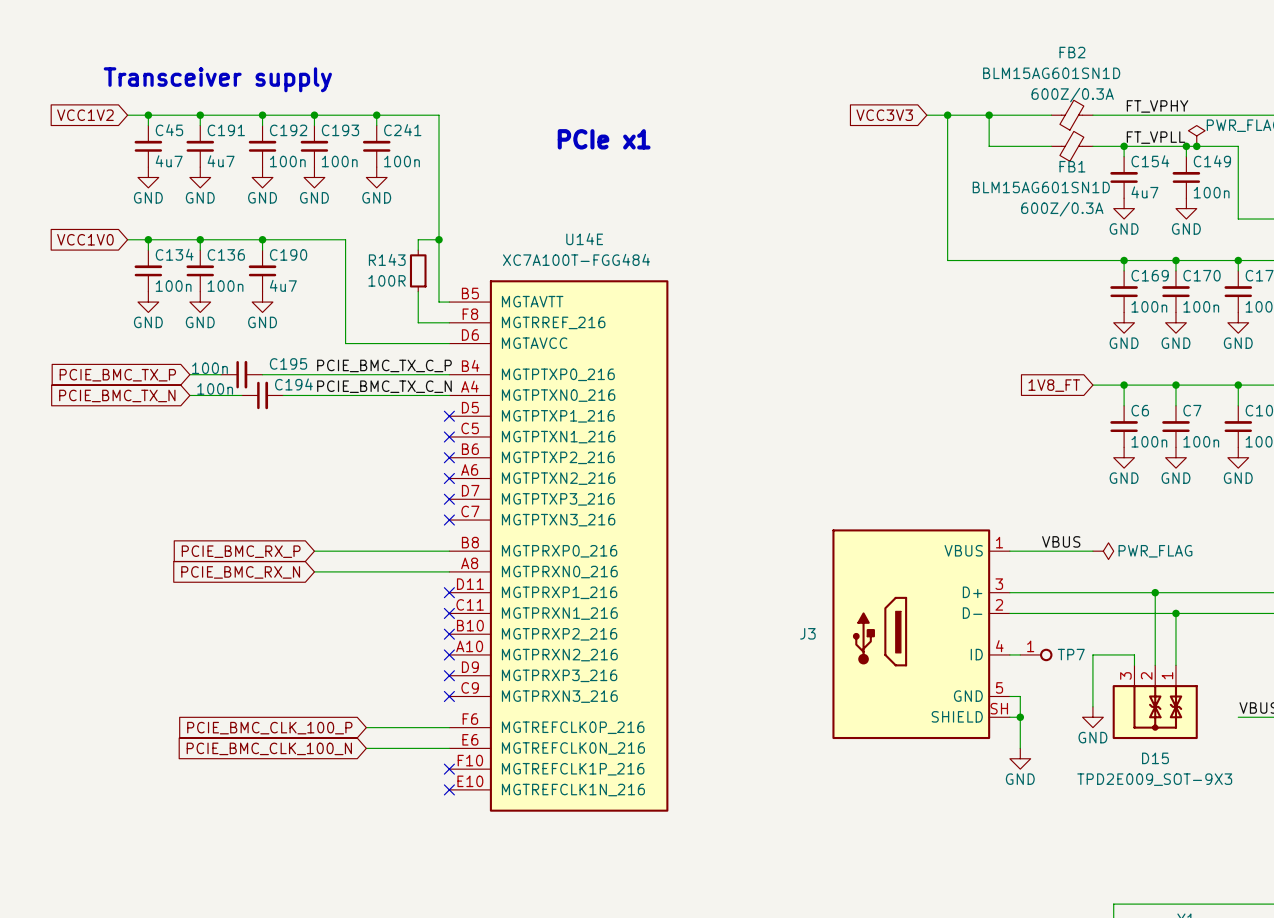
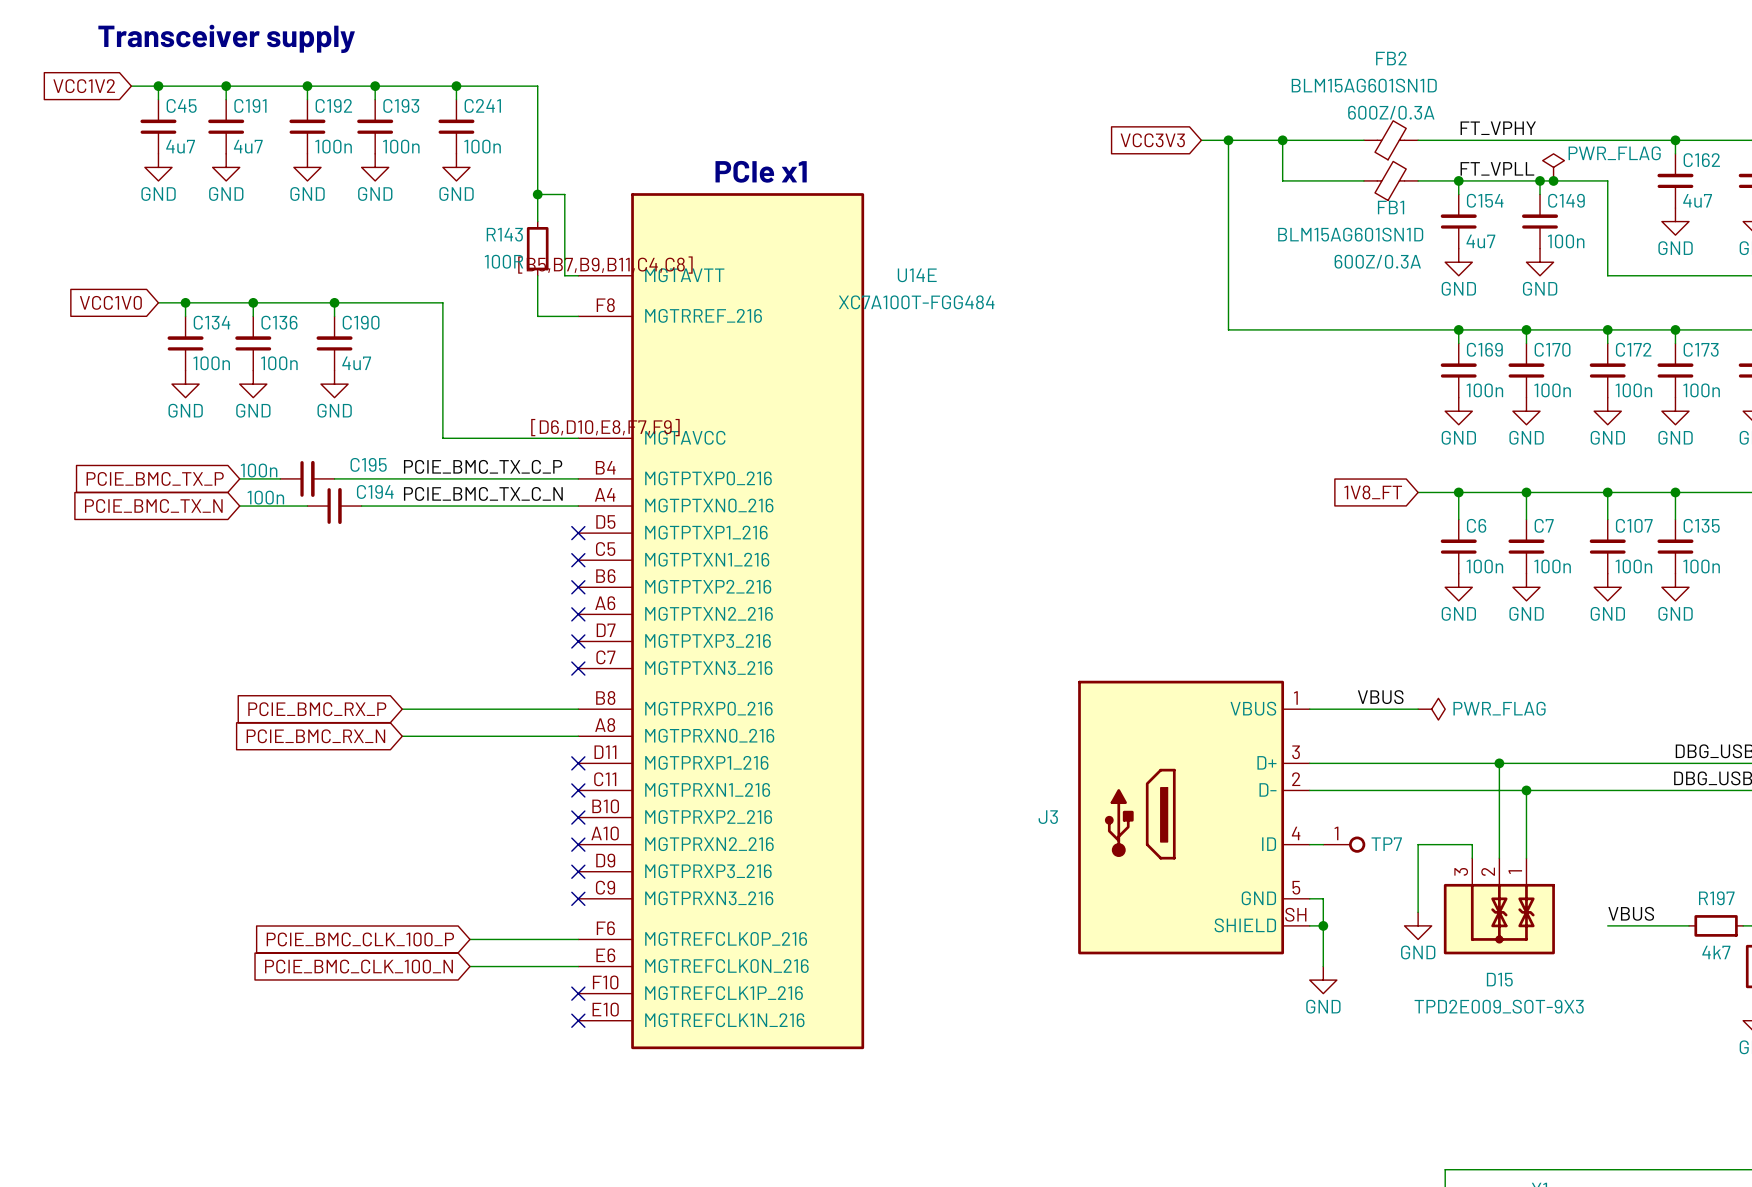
wire: none -> (131, 86) (537, 86) (537, 221)
junction: none -> (158, 86)
junction: none -> (226, 86)
junction: none -> (307, 86)
junction: none -> (375, 86)
junction: none -> (456, 86)
text position: Transceiver supply (217, 79) -> Transceiver supply (226, 38)
global label position: VCC1V2 (85, 115) -> VCC1V2 (84, 86)
wire: (127, 115) (439, 115) (439, 156) -> (537, 194) (564, 194)
junction: (148, 115) -> none
junction: (200, 115) -> none
wire: (262, 115) (262, 125) -> (307, 86) (307, 99)
junction: (262, 115) -> none
wire: (314, 115) (314, 125) -> (375, 86) (375, 99)
junction: (314, 115) -> none
wire: (376, 115) (376, 125) -> (456, 86) (456, 99)
junction: (376, 115) -> none
power symbol: none -> GND (158, 167)
power symbol: none -> GND (226, 167)
power symbol: none -> GND (307, 167)
power symbol: none -> GND (375, 167)
power symbol: none -> GND (456, 167)
C45 position: (148, 146) -> (158, 126)
C191 position: (200, 146) -> (226, 126)
C192 position: (262, 146) -> (307, 126)
C193 position: (314, 146) -> (375, 126)
C241 position: (376, 146) -> (456, 126)
junction: none -> (537, 194)
power symbol: GND (148, 177) -> none
power symbol: GND (200, 177) -> none
power symbol: GND (262, 177) -> none
power symbol: GND (314, 177) -> none
power symbol: GND (376, 177) -> none
wire: (439, 219) (439, 302) (449, 302) -> (564, 275) (578, 275)
wire: (418, 239) (439, 239) -> (537, 302) (537, 275)
junction: (439, 239) -> none
U14E name position: U14E (584, 239) -> U14E (917, 275)
wire: none -> (537, 316) (578, 316)
U14E value position: XC7A100T-FGG484 (576, 259) -> XC7A100T-FGG484 (916, 302)
R143 position: (418, 270) -> (537, 248)
U14E symbol: [449, 280, 669, 812] -> [578, 193, 865, 1050]
wire: (418, 291) (418, 322) (449, 322) -> none

